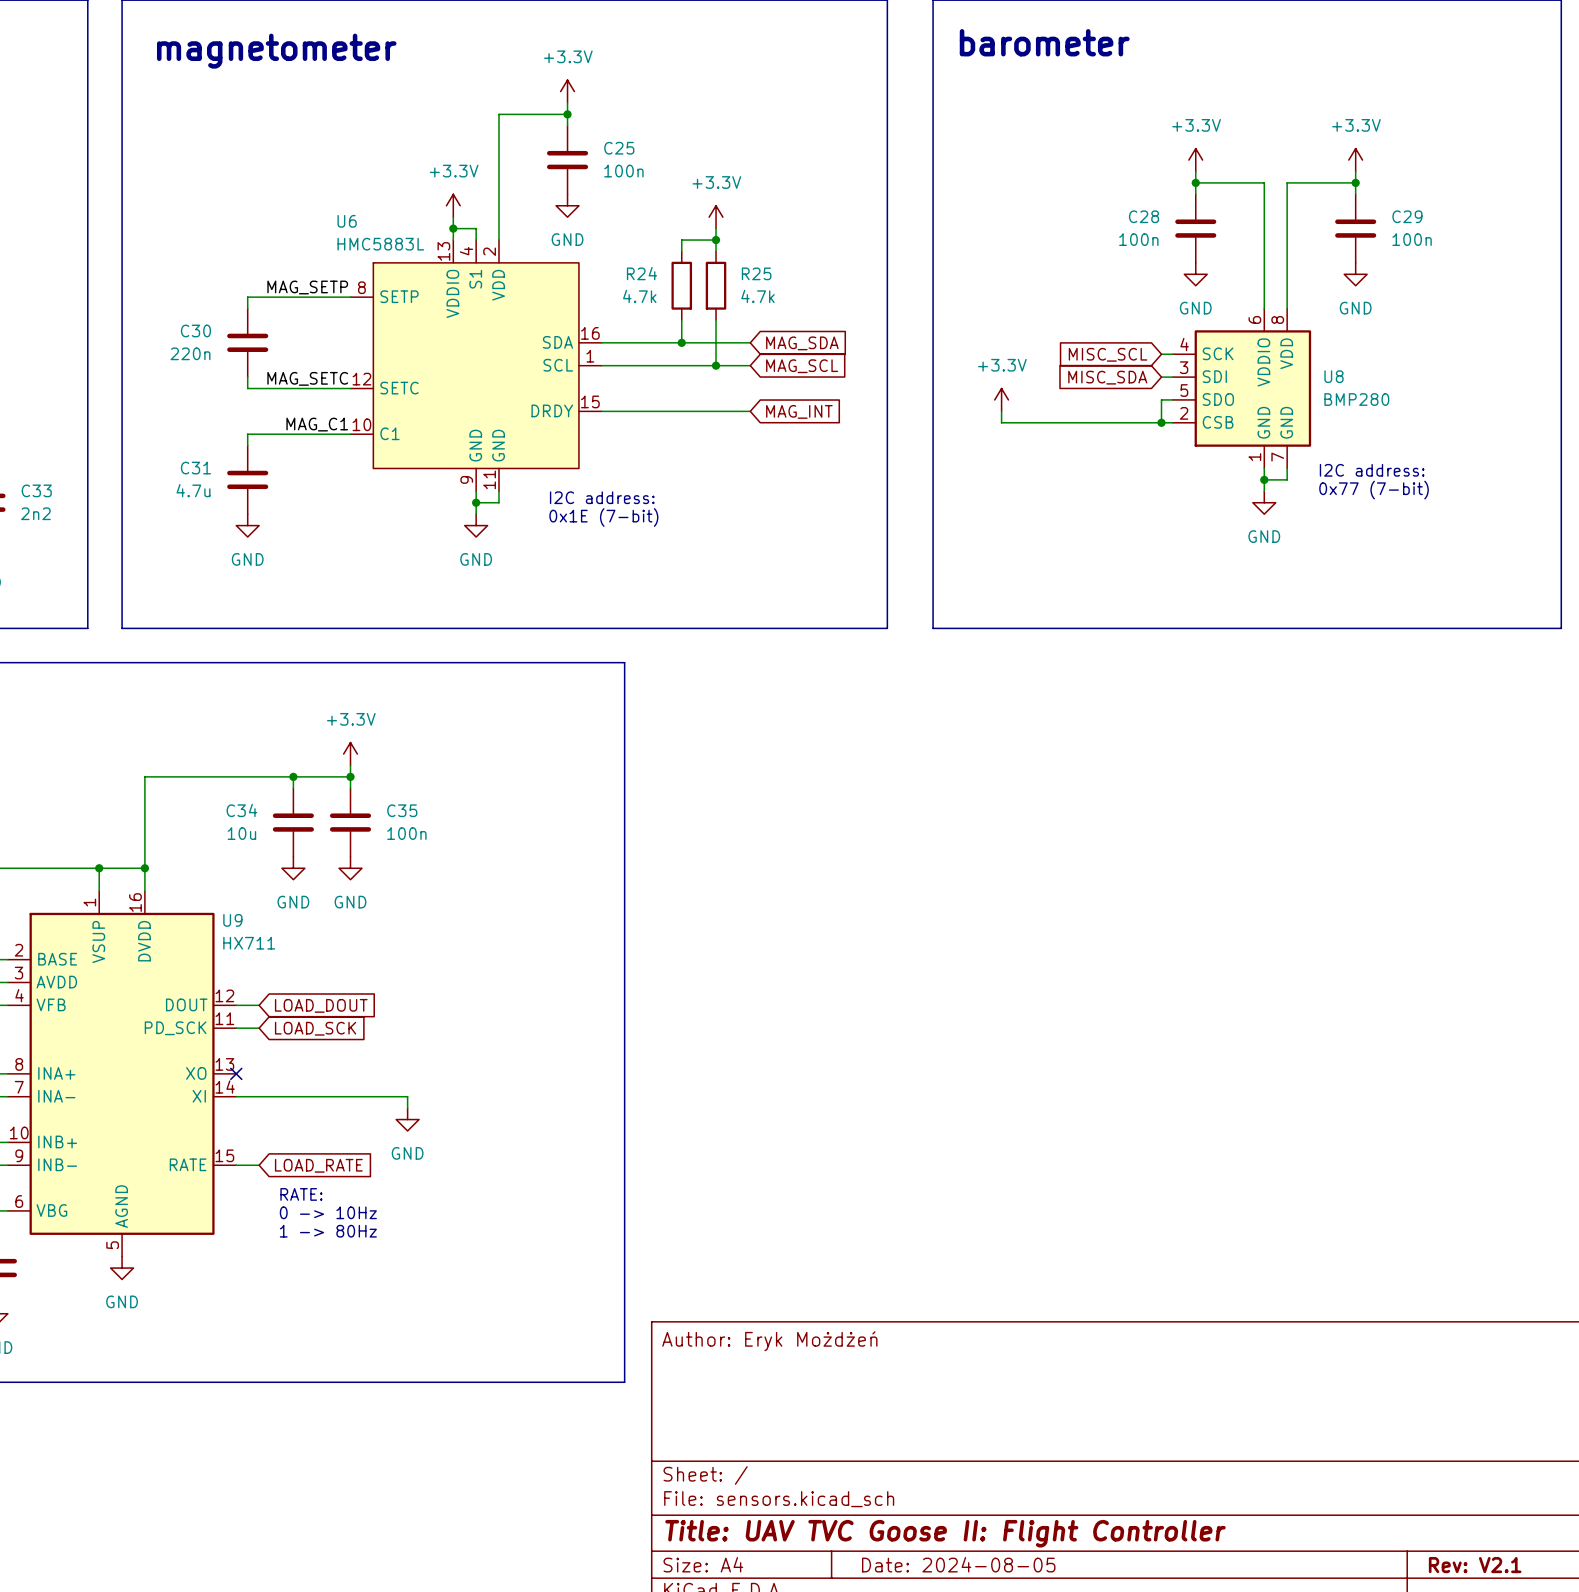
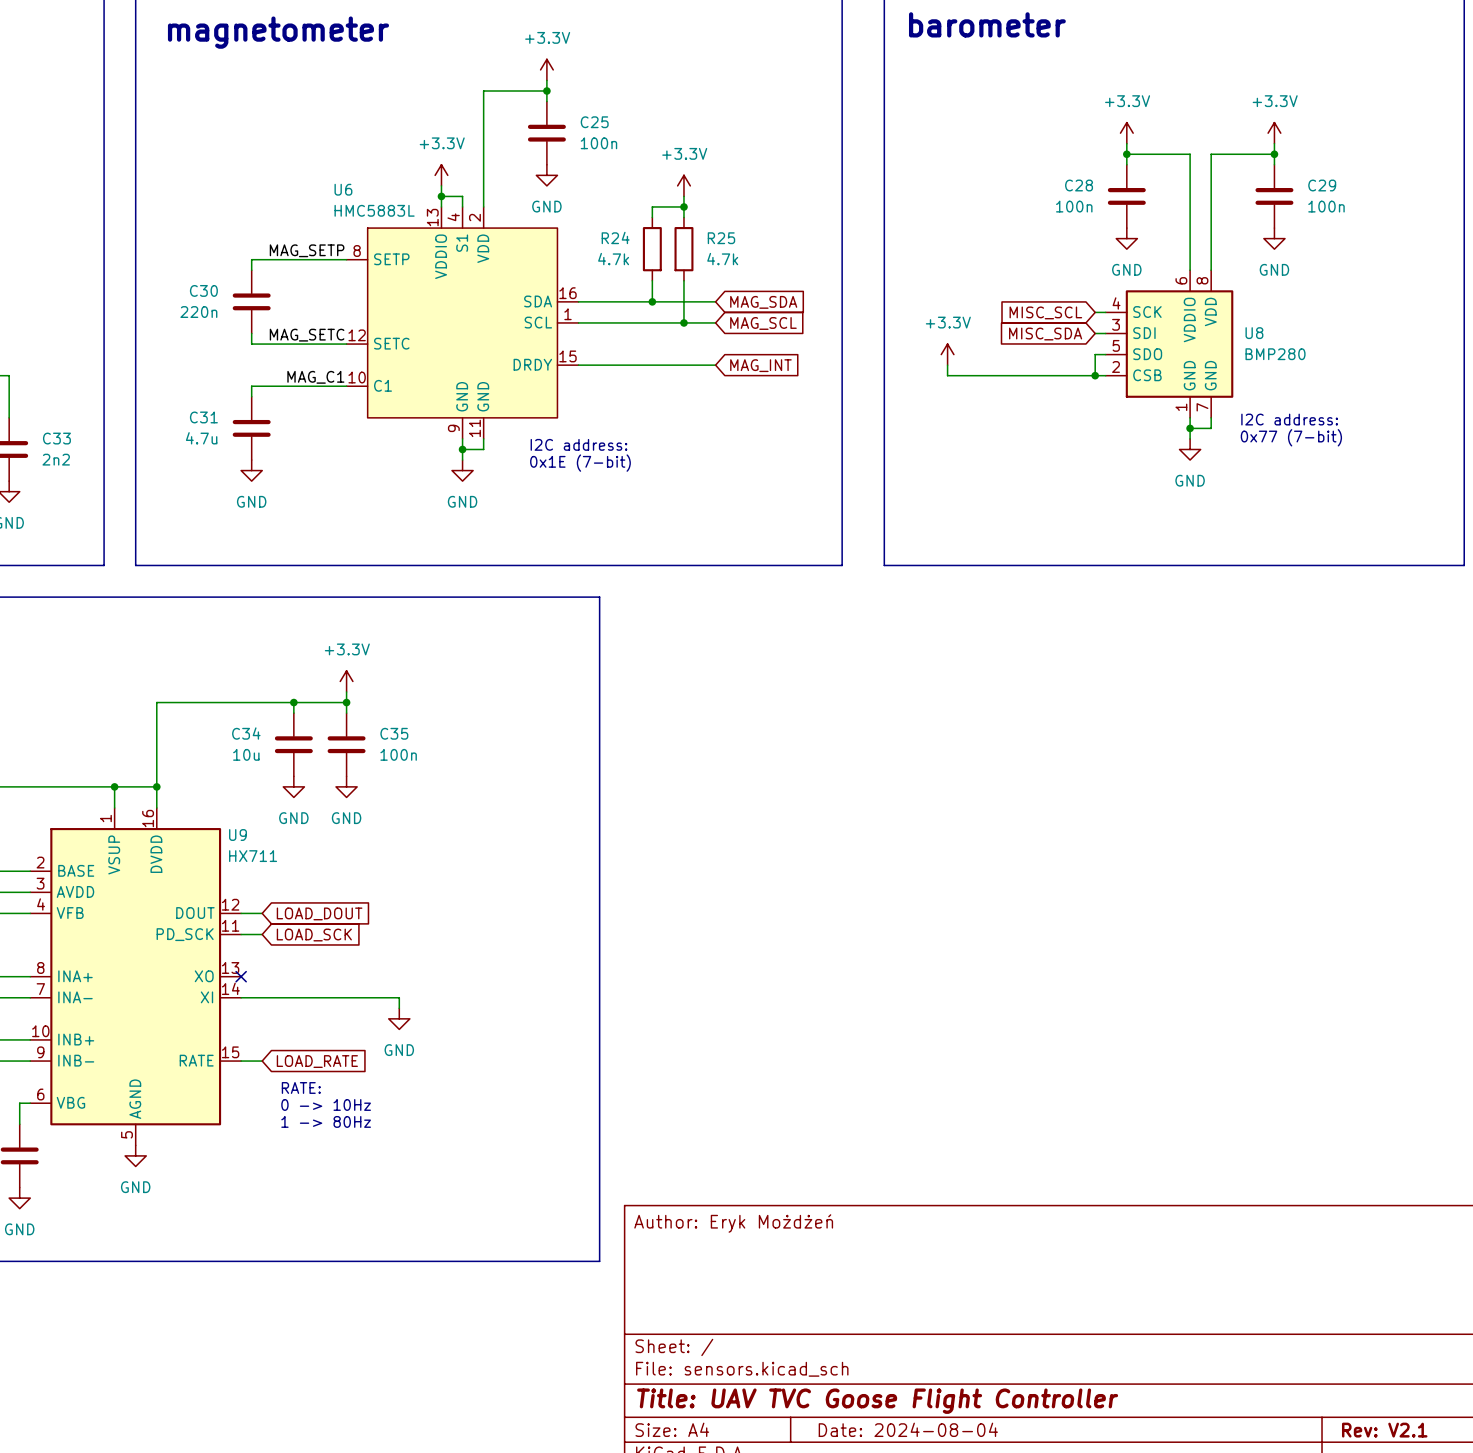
title block: Title: UAV TVC Goose II: Flight Controller (945, 1533) -> Title: UAV TVC Goose Flight Controller (877, 1401)
title block: Date: 2024-08-05 (958, 1564) -> Date: 2024-08-04 (908, 1429)

